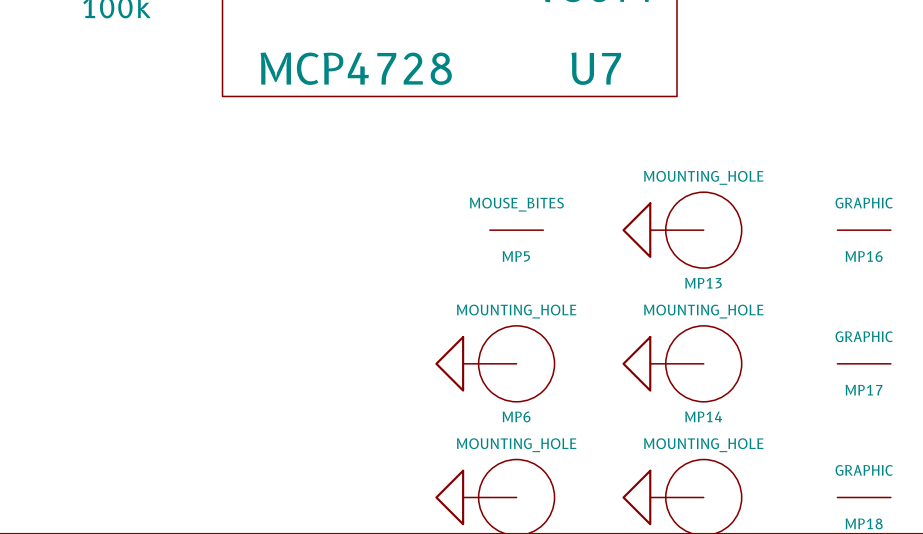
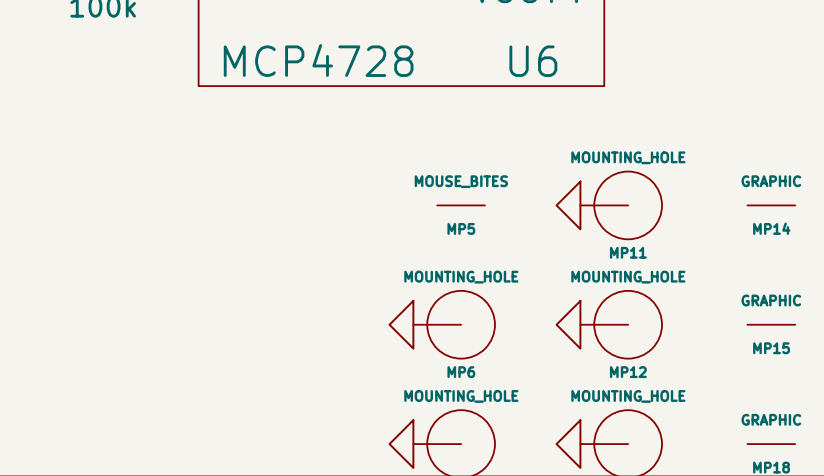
U7 name: U7 (596, 68) -> U6 (533, 61)
MP16 name: MP16 (864, 256) -> MP14 (771, 228)
MP13 name: MP13 (703, 283) -> MP11 (628, 252)
MP17 name: MP17 (864, 390) -> MP15 (771, 348)
MP14 name: MP14 (703, 416) -> MP12 (628, 372)

